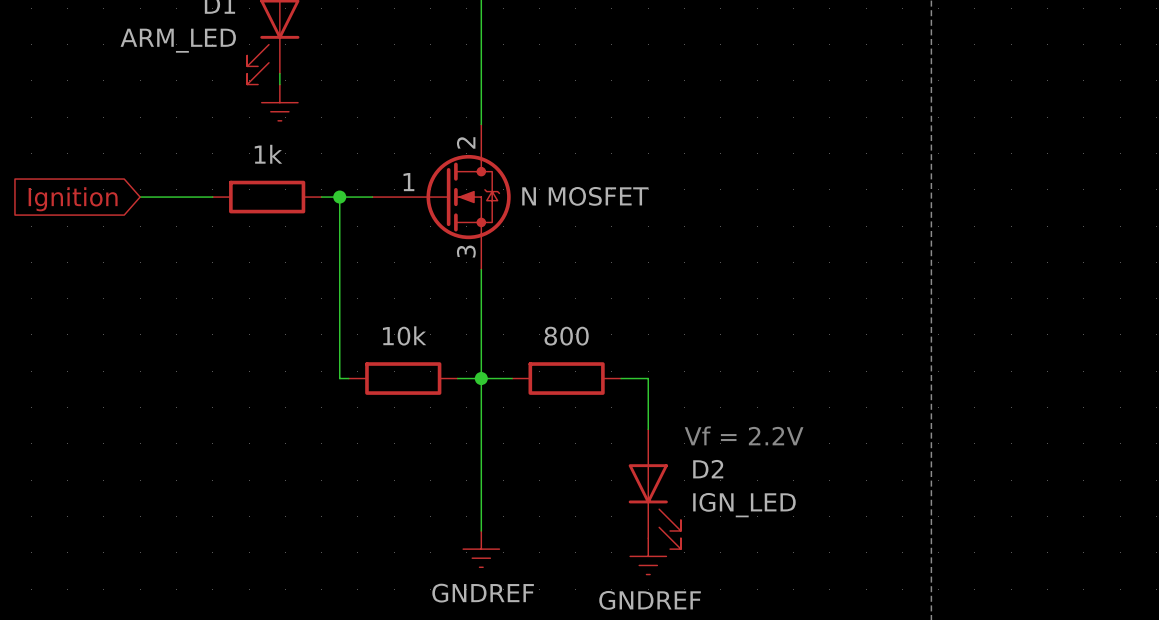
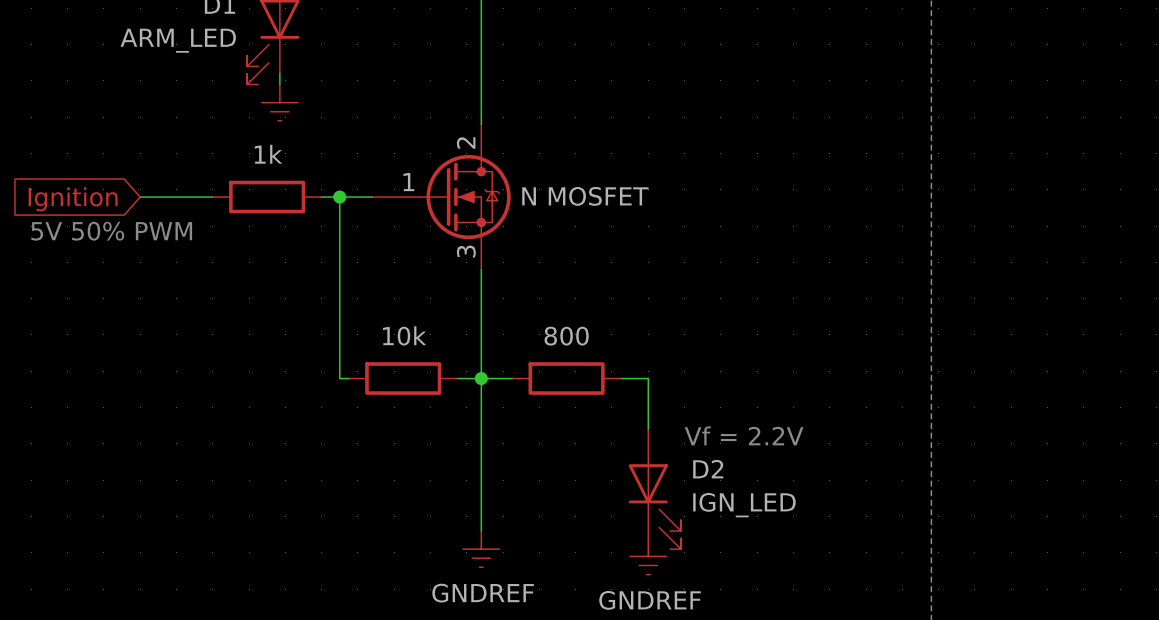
text: none -> 5V 50% PWM (111, 231)

